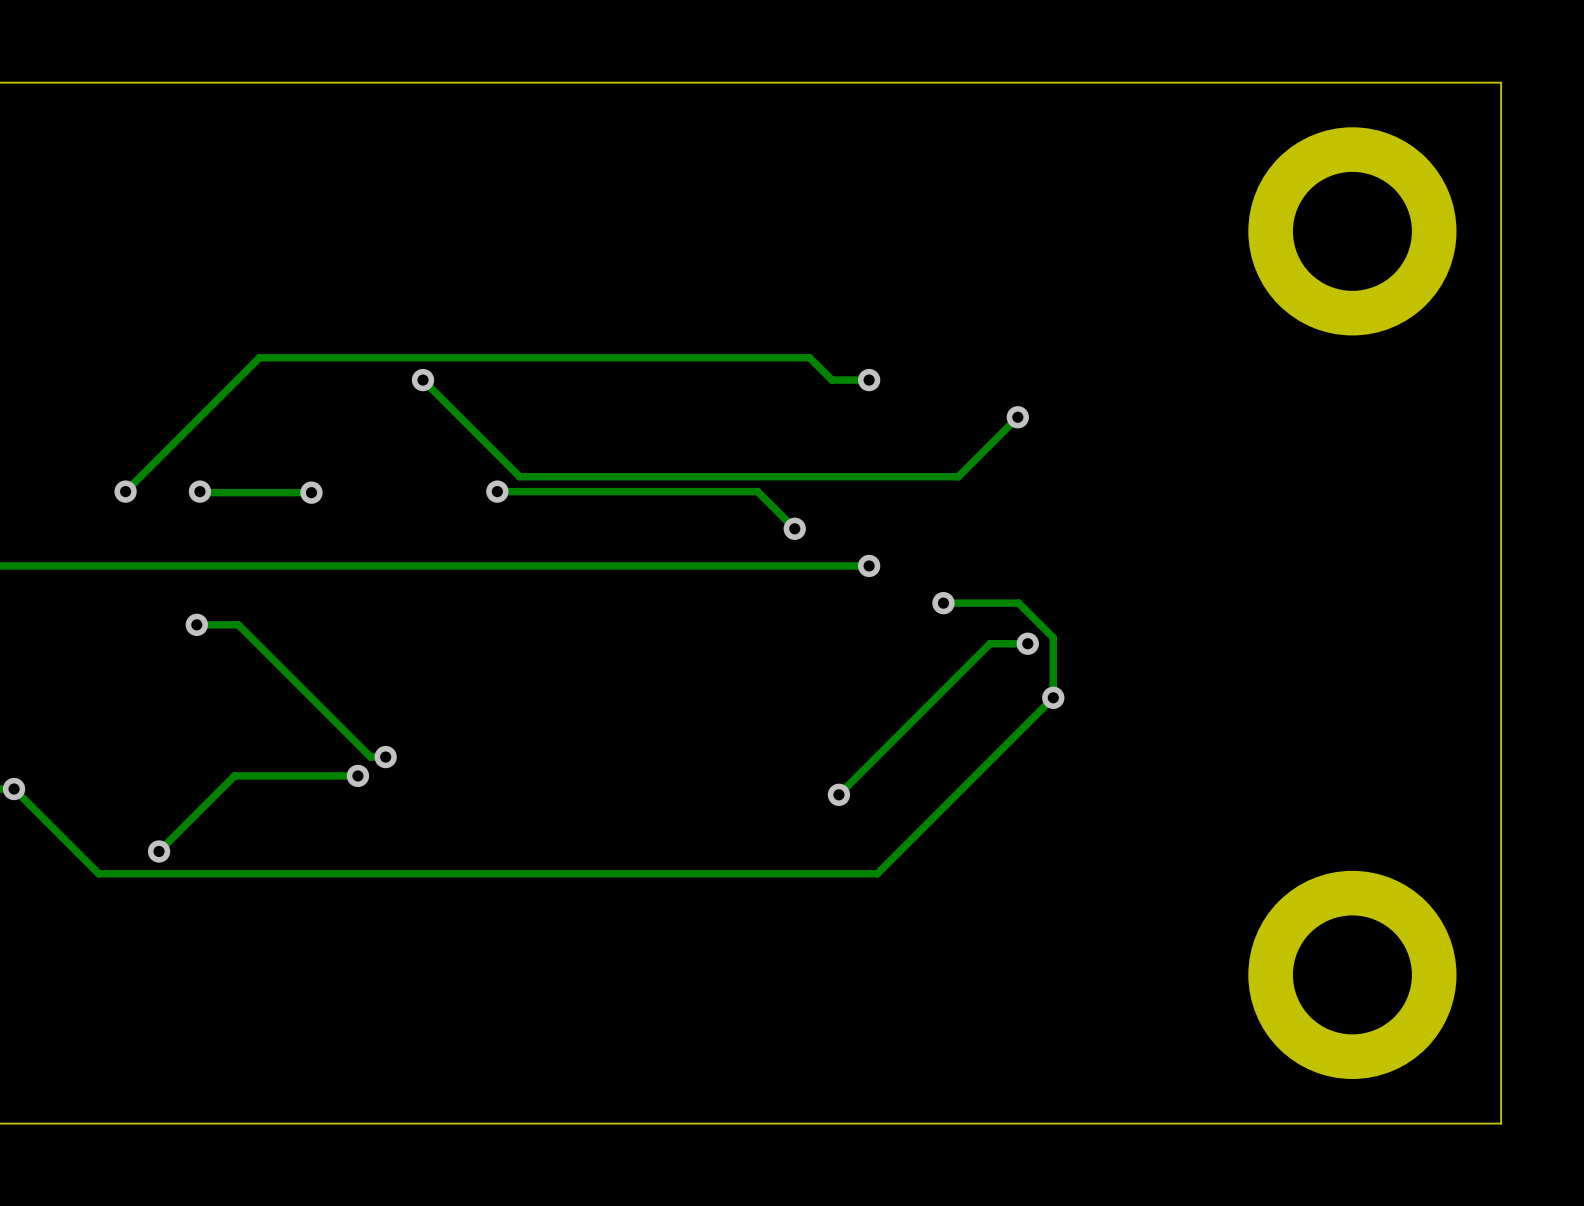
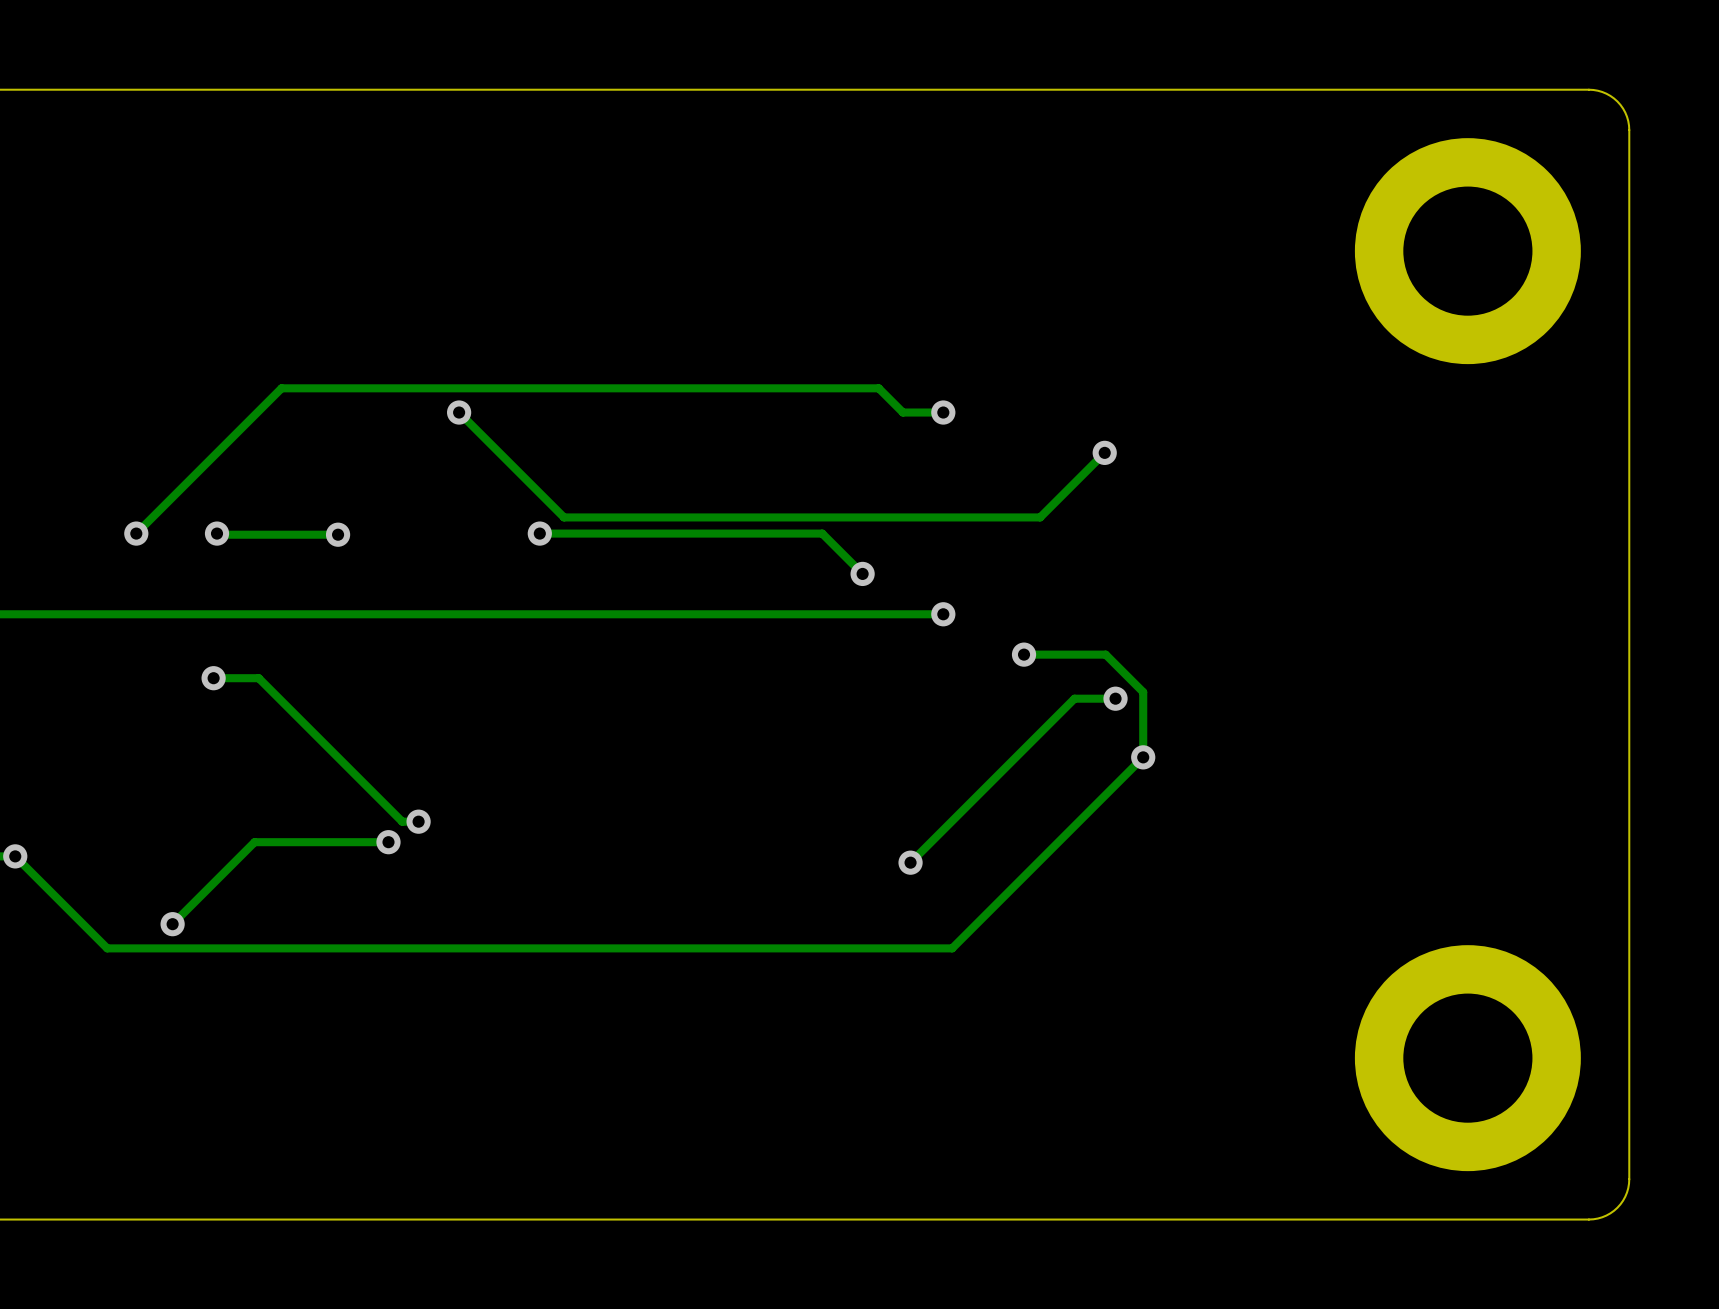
board edge: (1463, 82) (1501, 82) (1501, 119) -> (1588, 89) (1602, 91) (1617, 101) (1625, 112) (1629, 130)
board edge: (1501, 1086) (1501, 1123) (1463, 1123) -> (1629, 1179) (1625, 1196) (1617, 1207) (1606, 1215) (1588, 1219)

